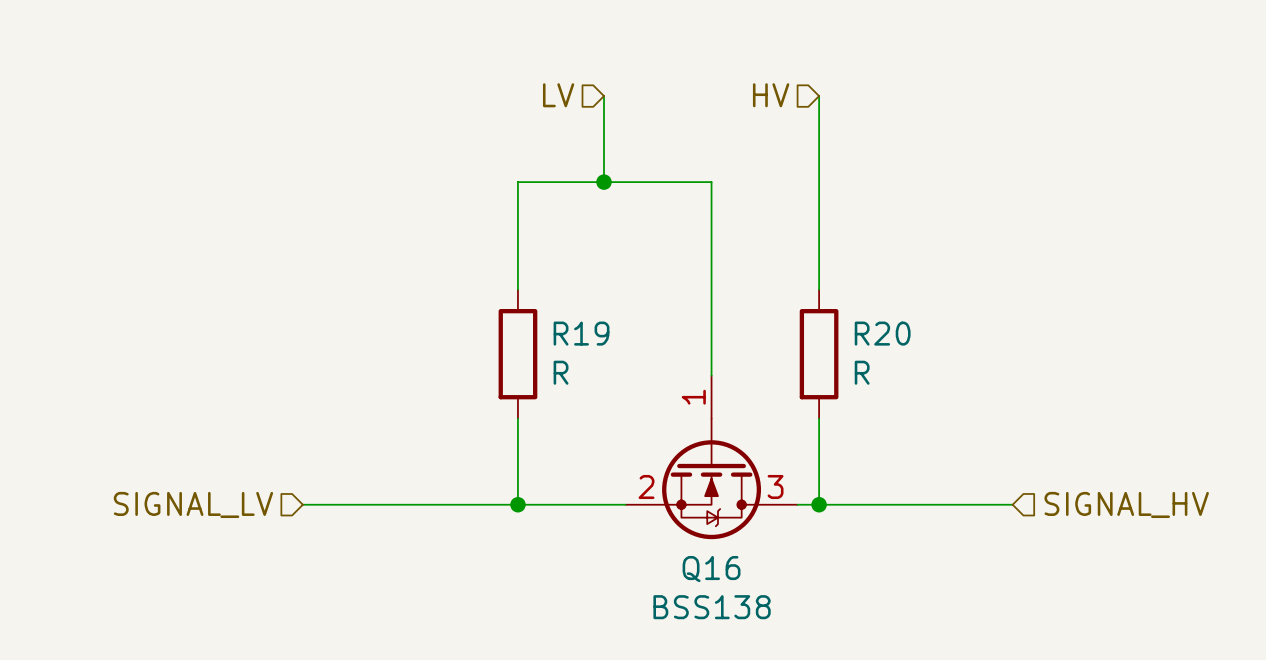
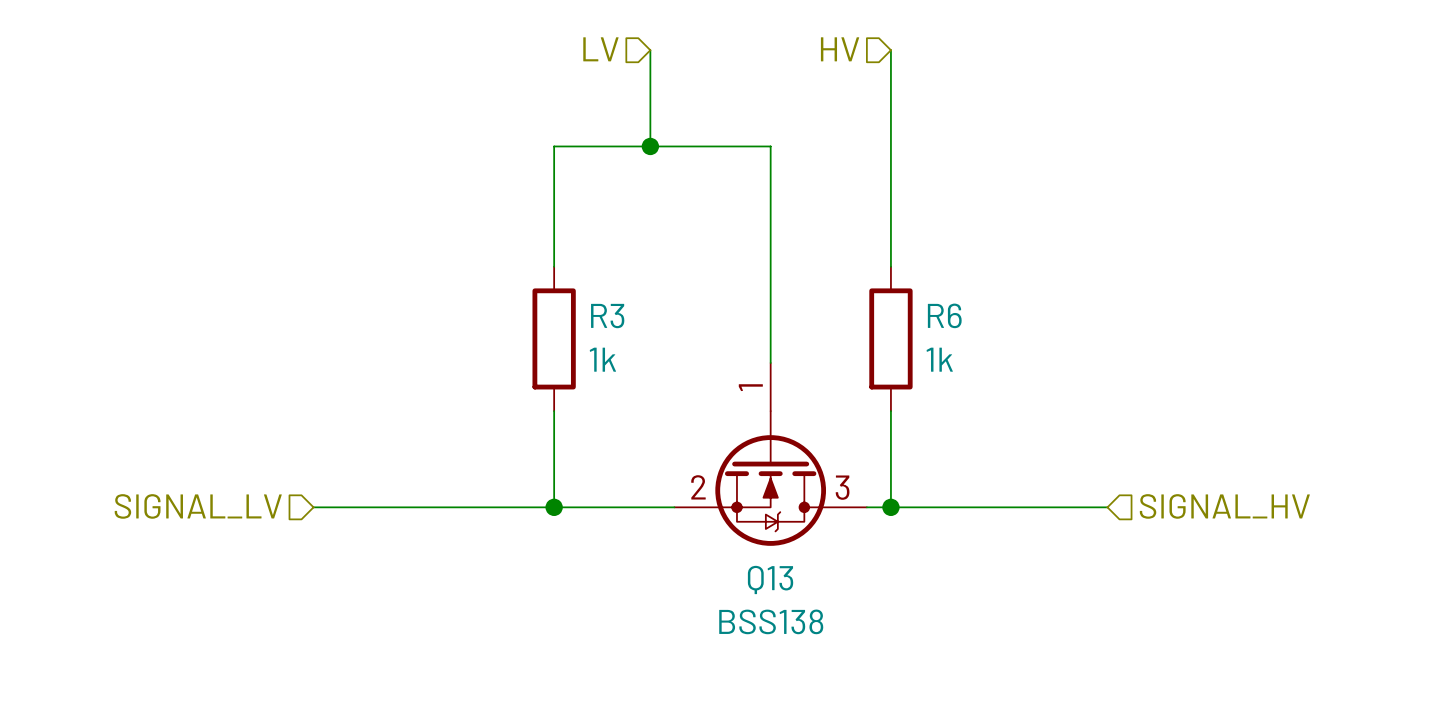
R19 name: R19 (581, 333) -> R3 (607, 316)
R20 name: R20 (882, 333) -> R6 (944, 315)
R19 value: R (561, 372) -> 1k (602, 359)
R20 value: R (862, 372) -> 1k (939, 359)
Q16 name: Q16 (711, 569) -> Q13 (770, 579)

